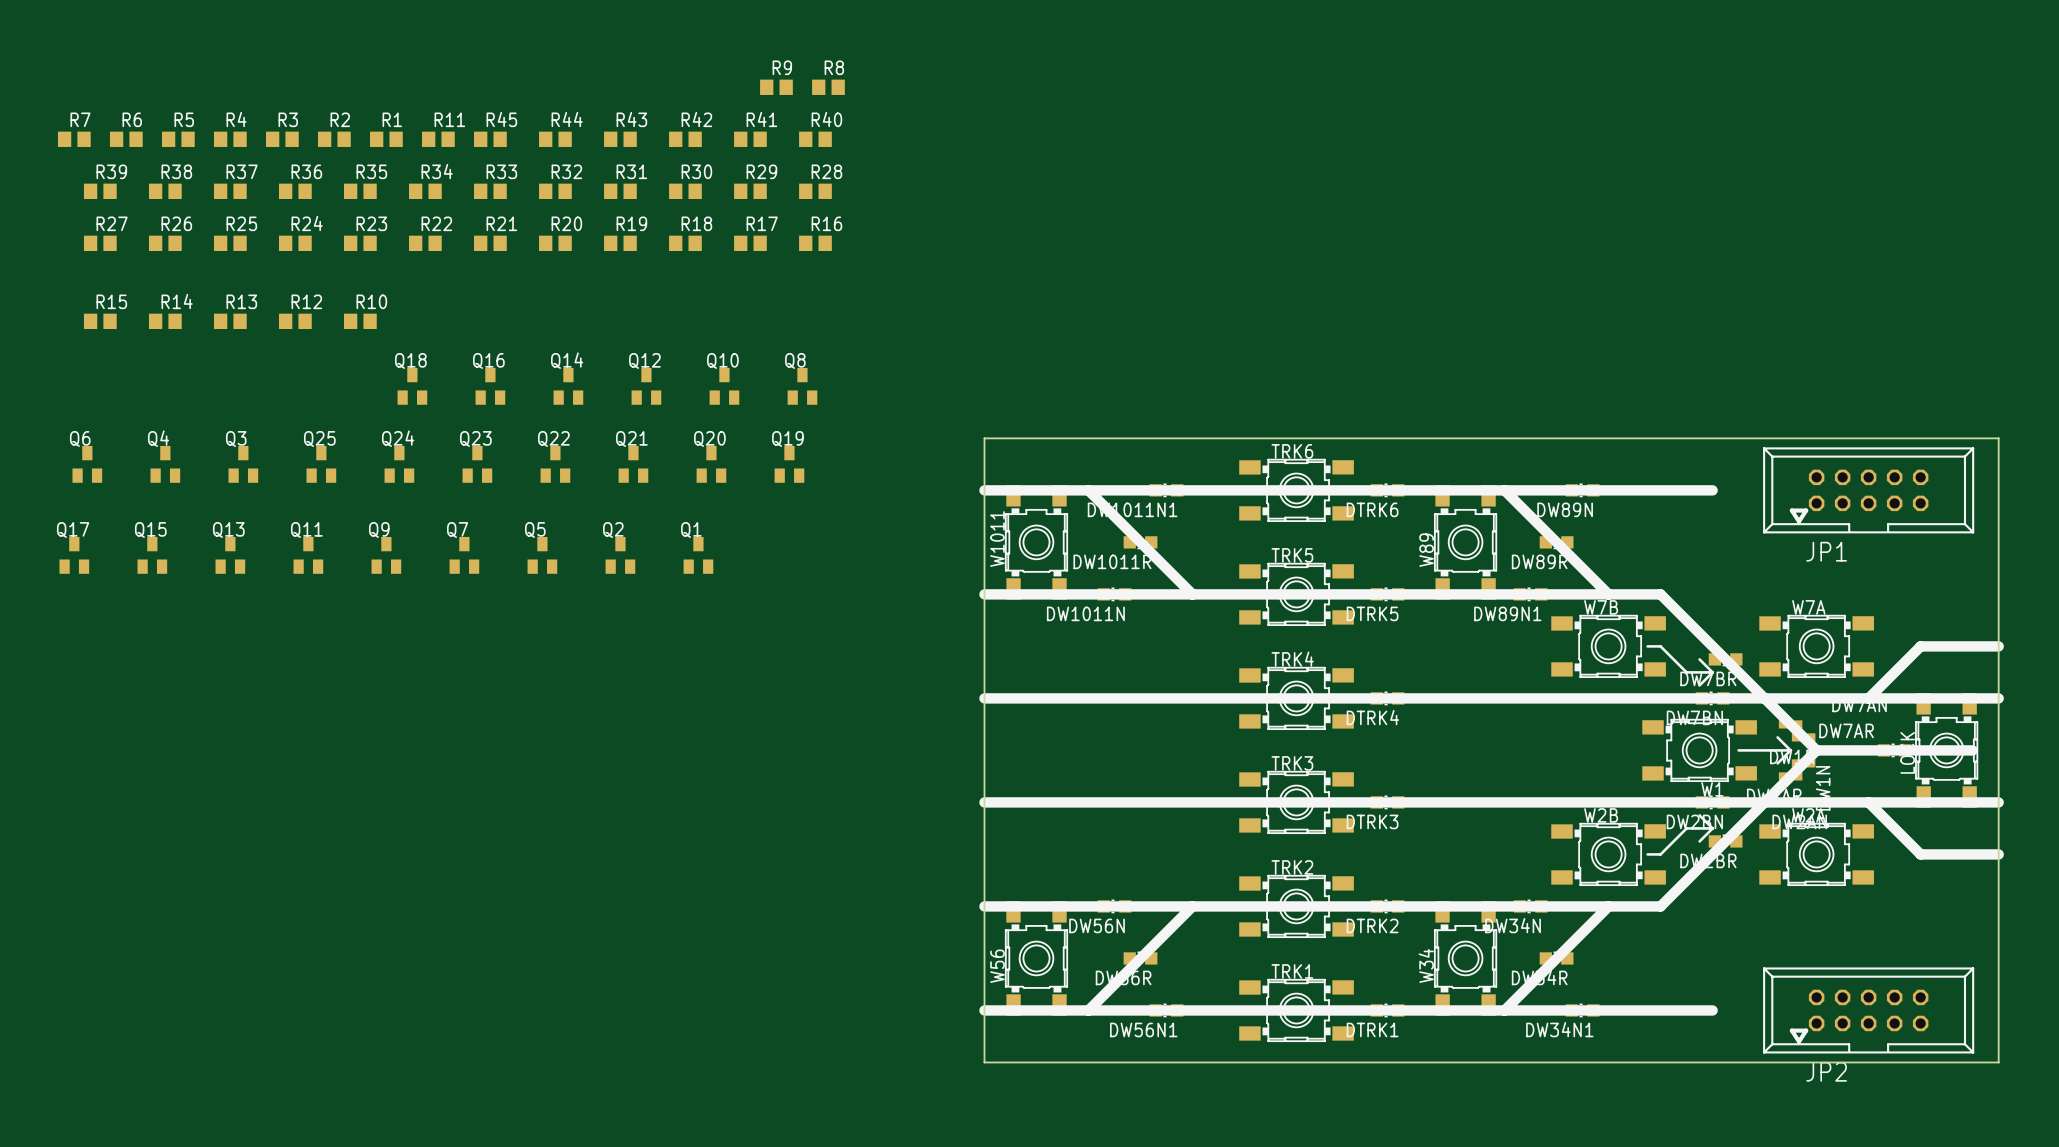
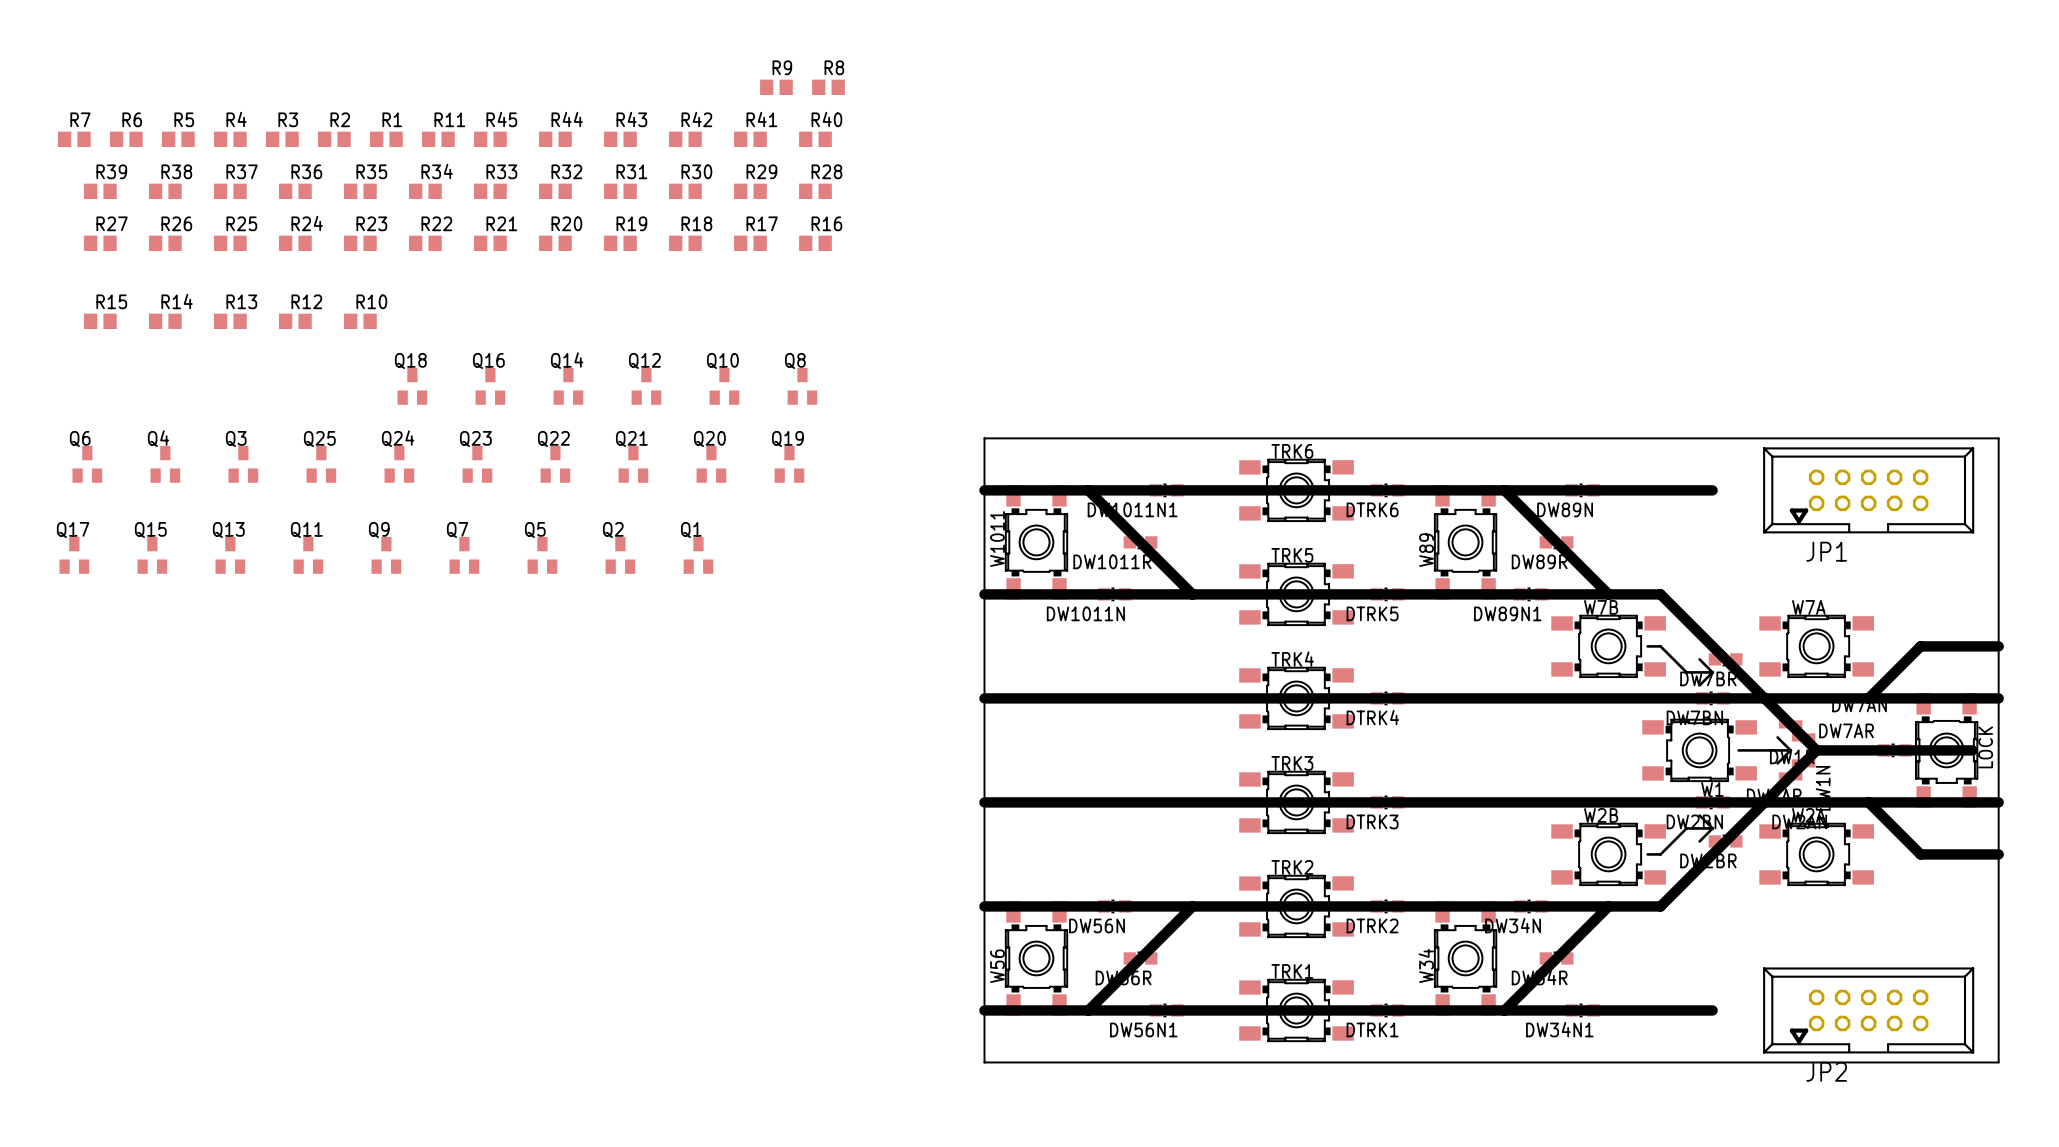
LOCK rotation: 0° (1946, 750) -> 180° (1946, 750)

